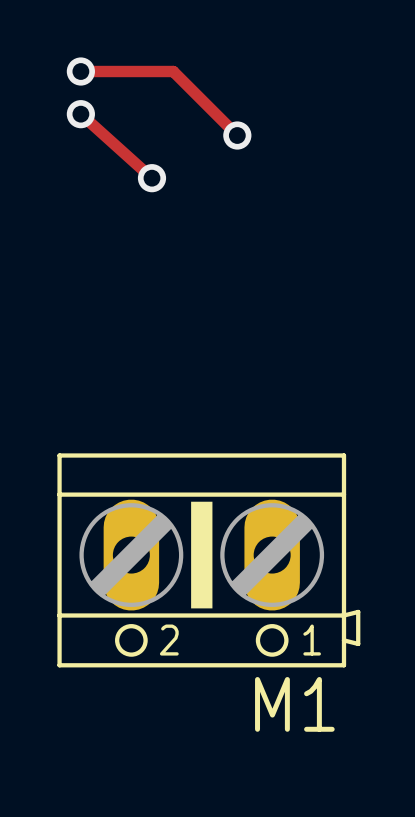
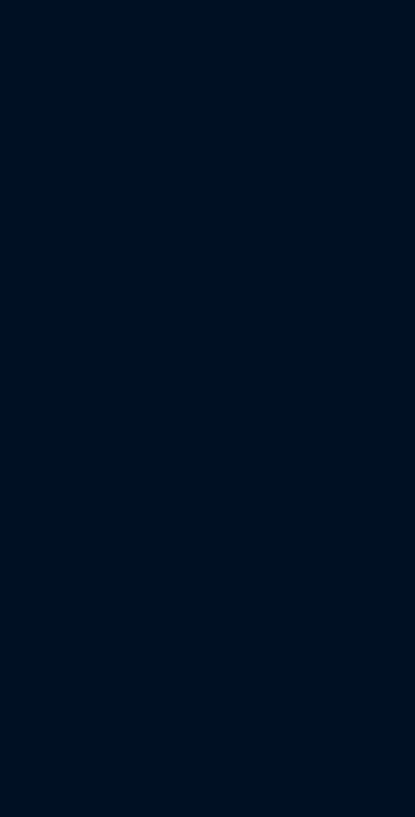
track: (80, 71) (173, 71) (237, 135) -> none
via: (80, 71) -> none
track: (80, 114) (151, 178) -> none
via: (80, 114) -> none
via: (237, 135) -> none
via: (151, 178) -> none
M1: (208, 560) -> none

